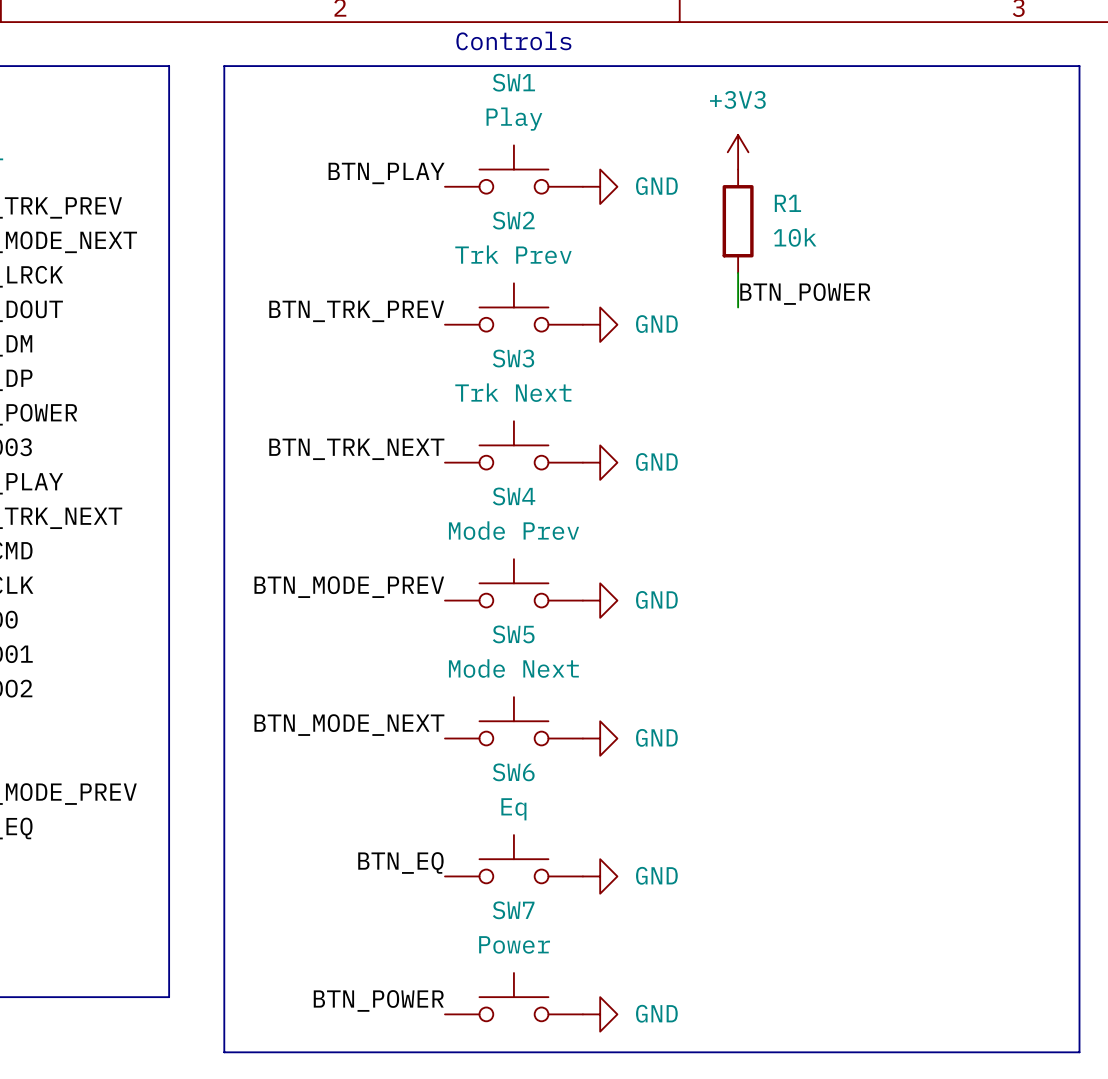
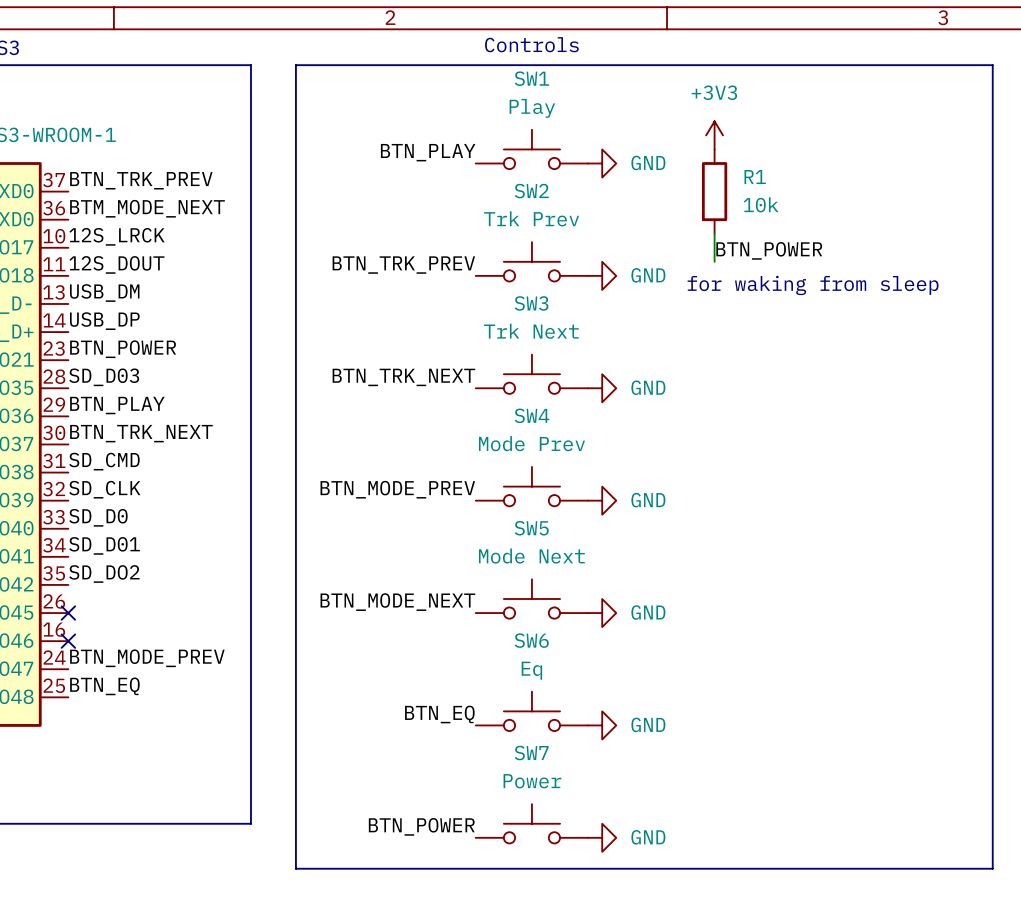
text: none -> for waking from sleep (813, 285)

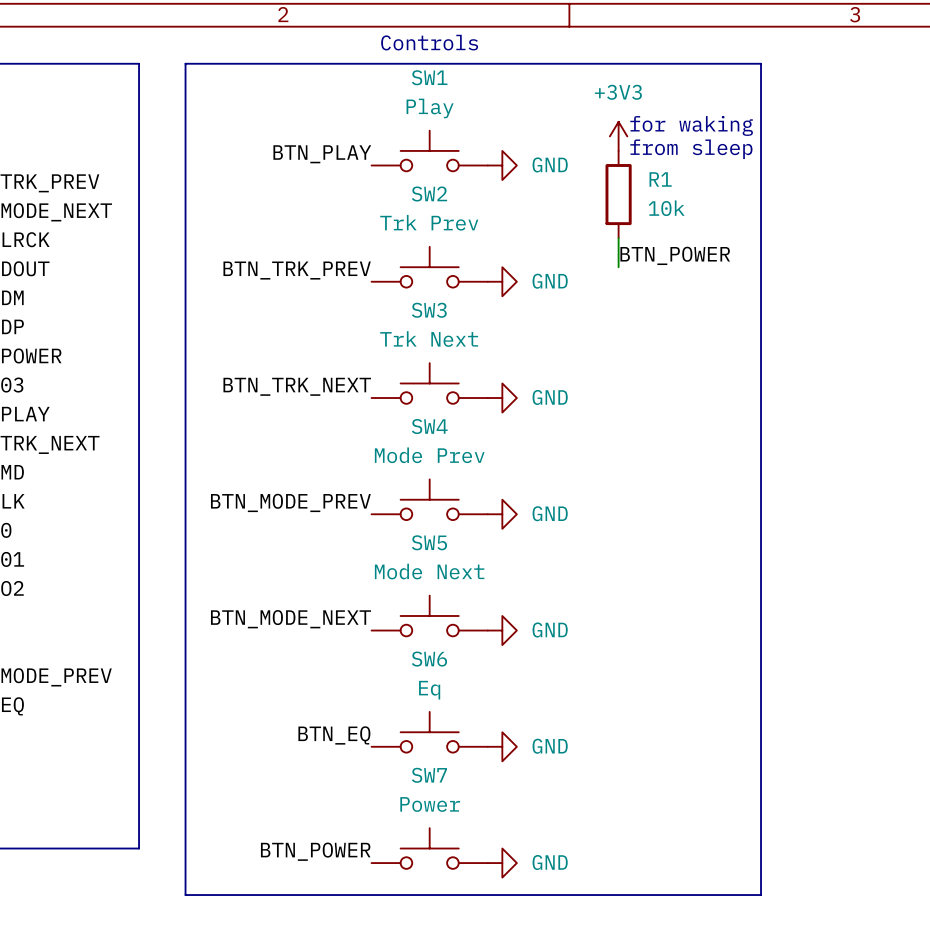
line: (852, 65) (992, 65) (992, 868) (852, 868) -> (761, 63) (761, 895)
text: none -> for waking (691, 125)
text: none -> from sleep (691, 149)
text: for waking from sleep (813, 285) -> none

